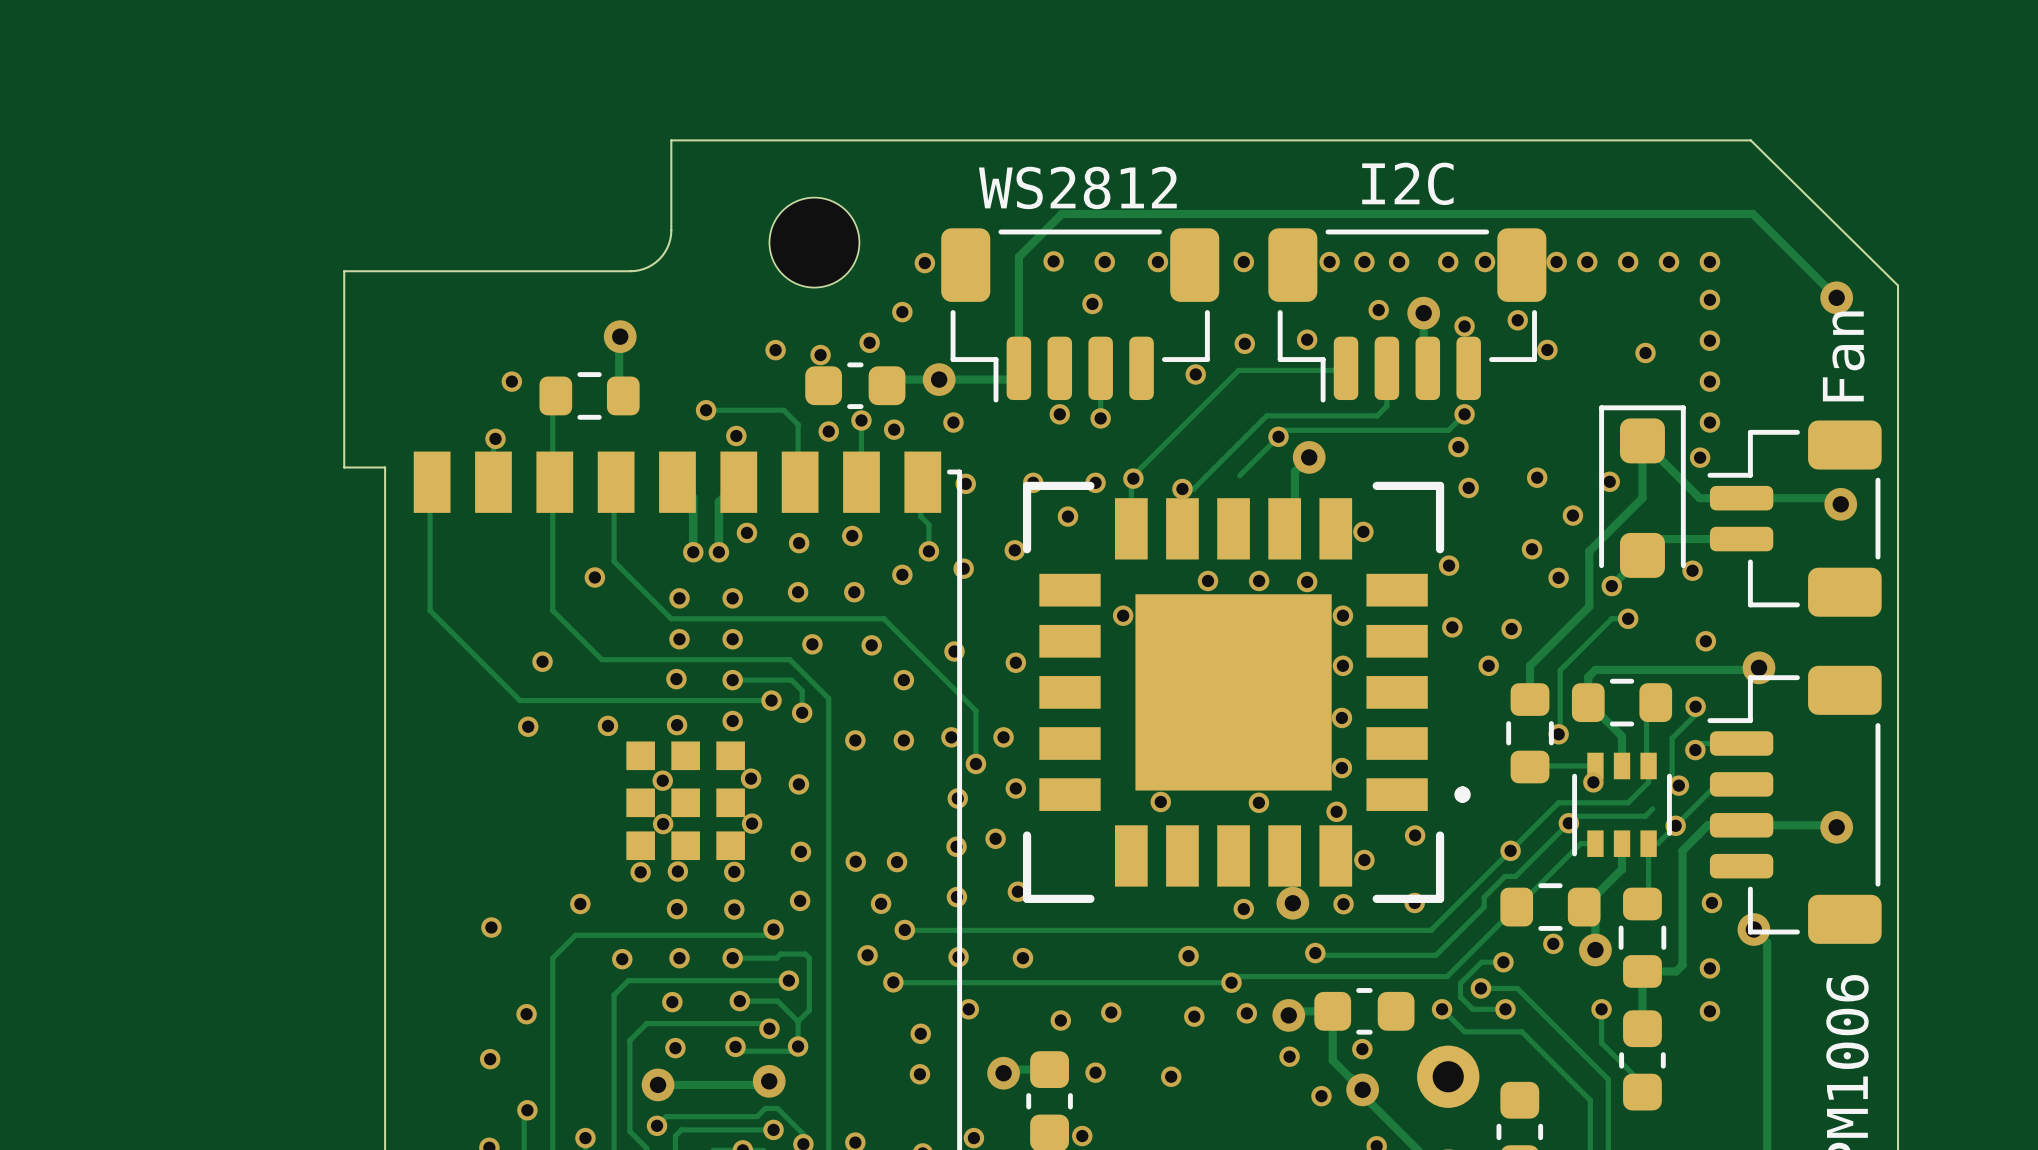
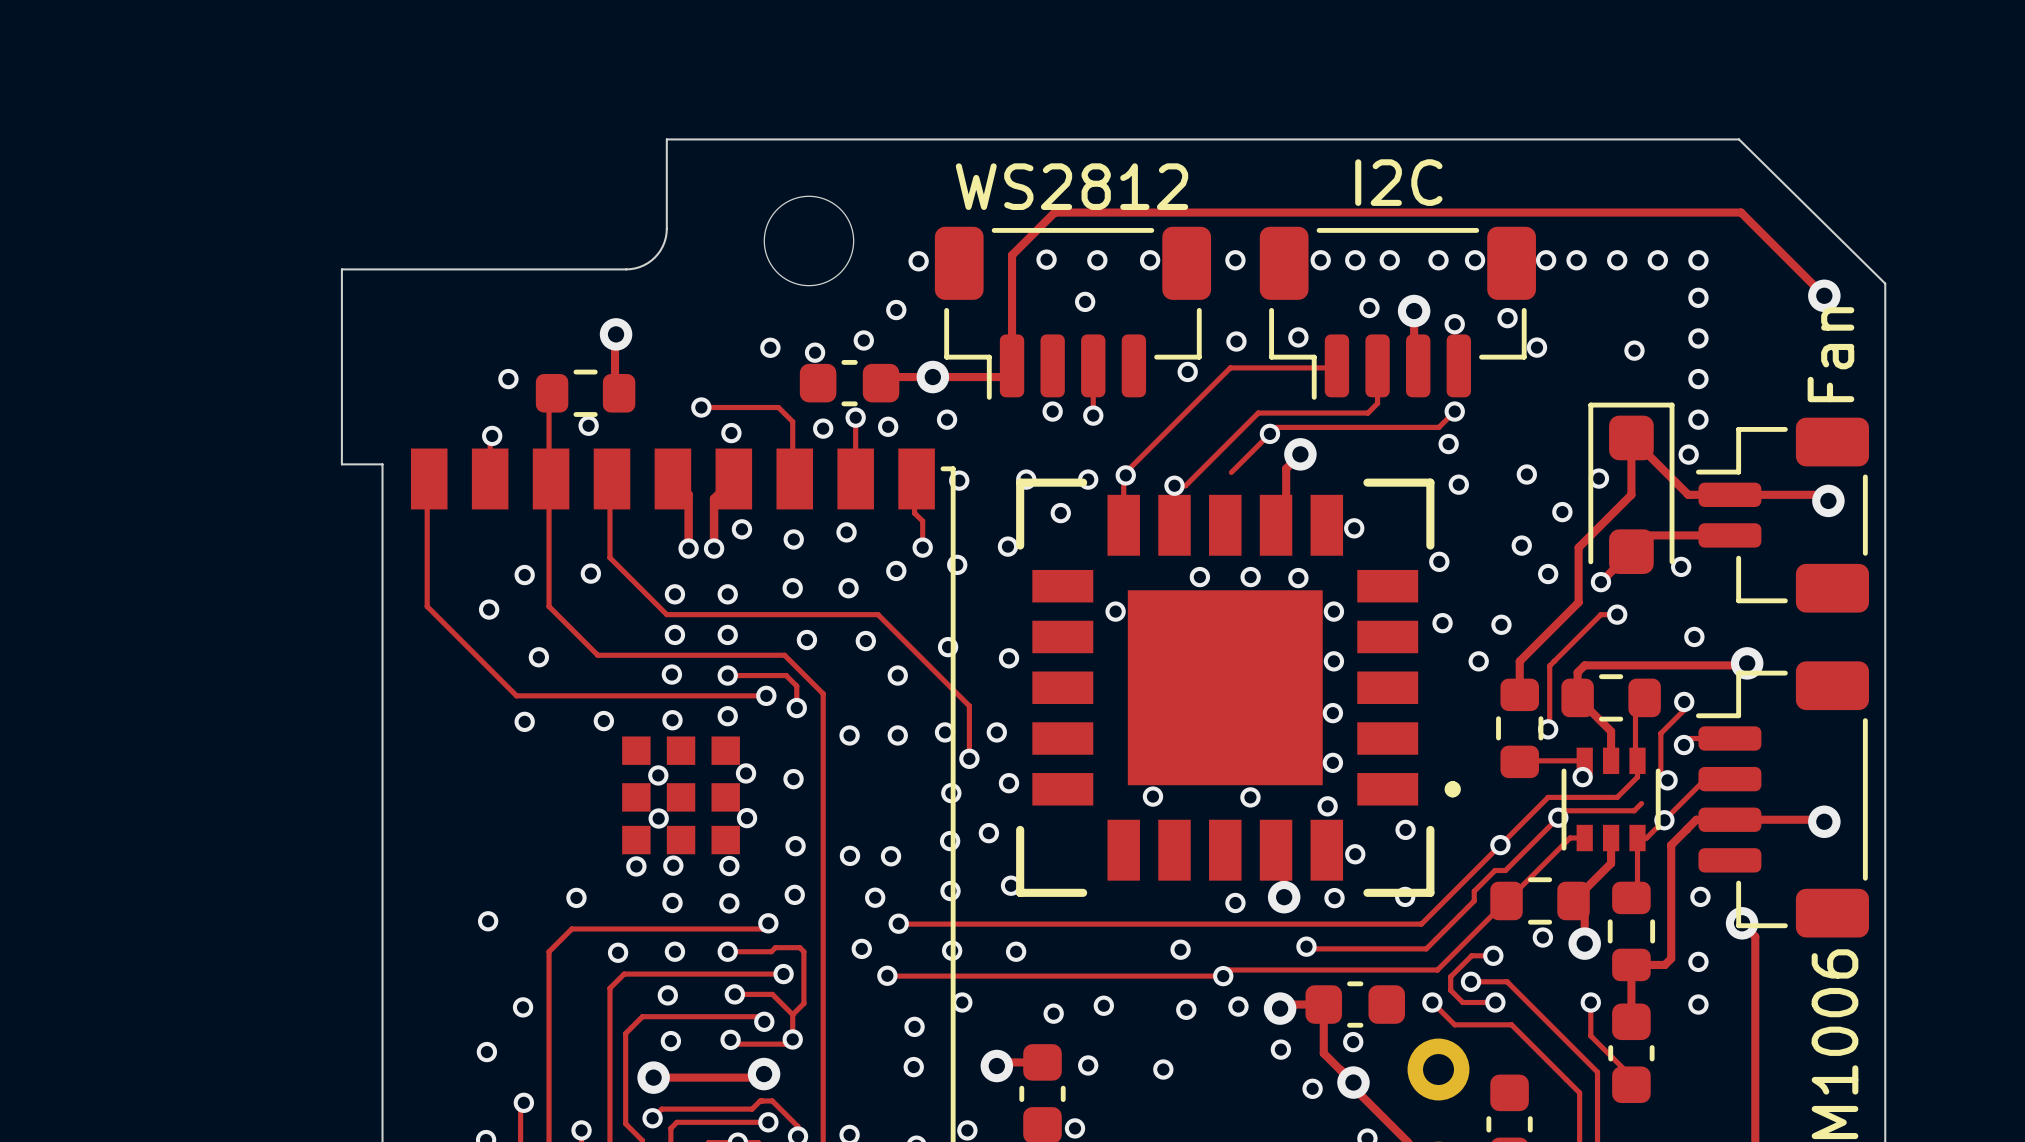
via: none -> (588, 425)
via: none -> (524, 575)
via: none -> (489, 609)

